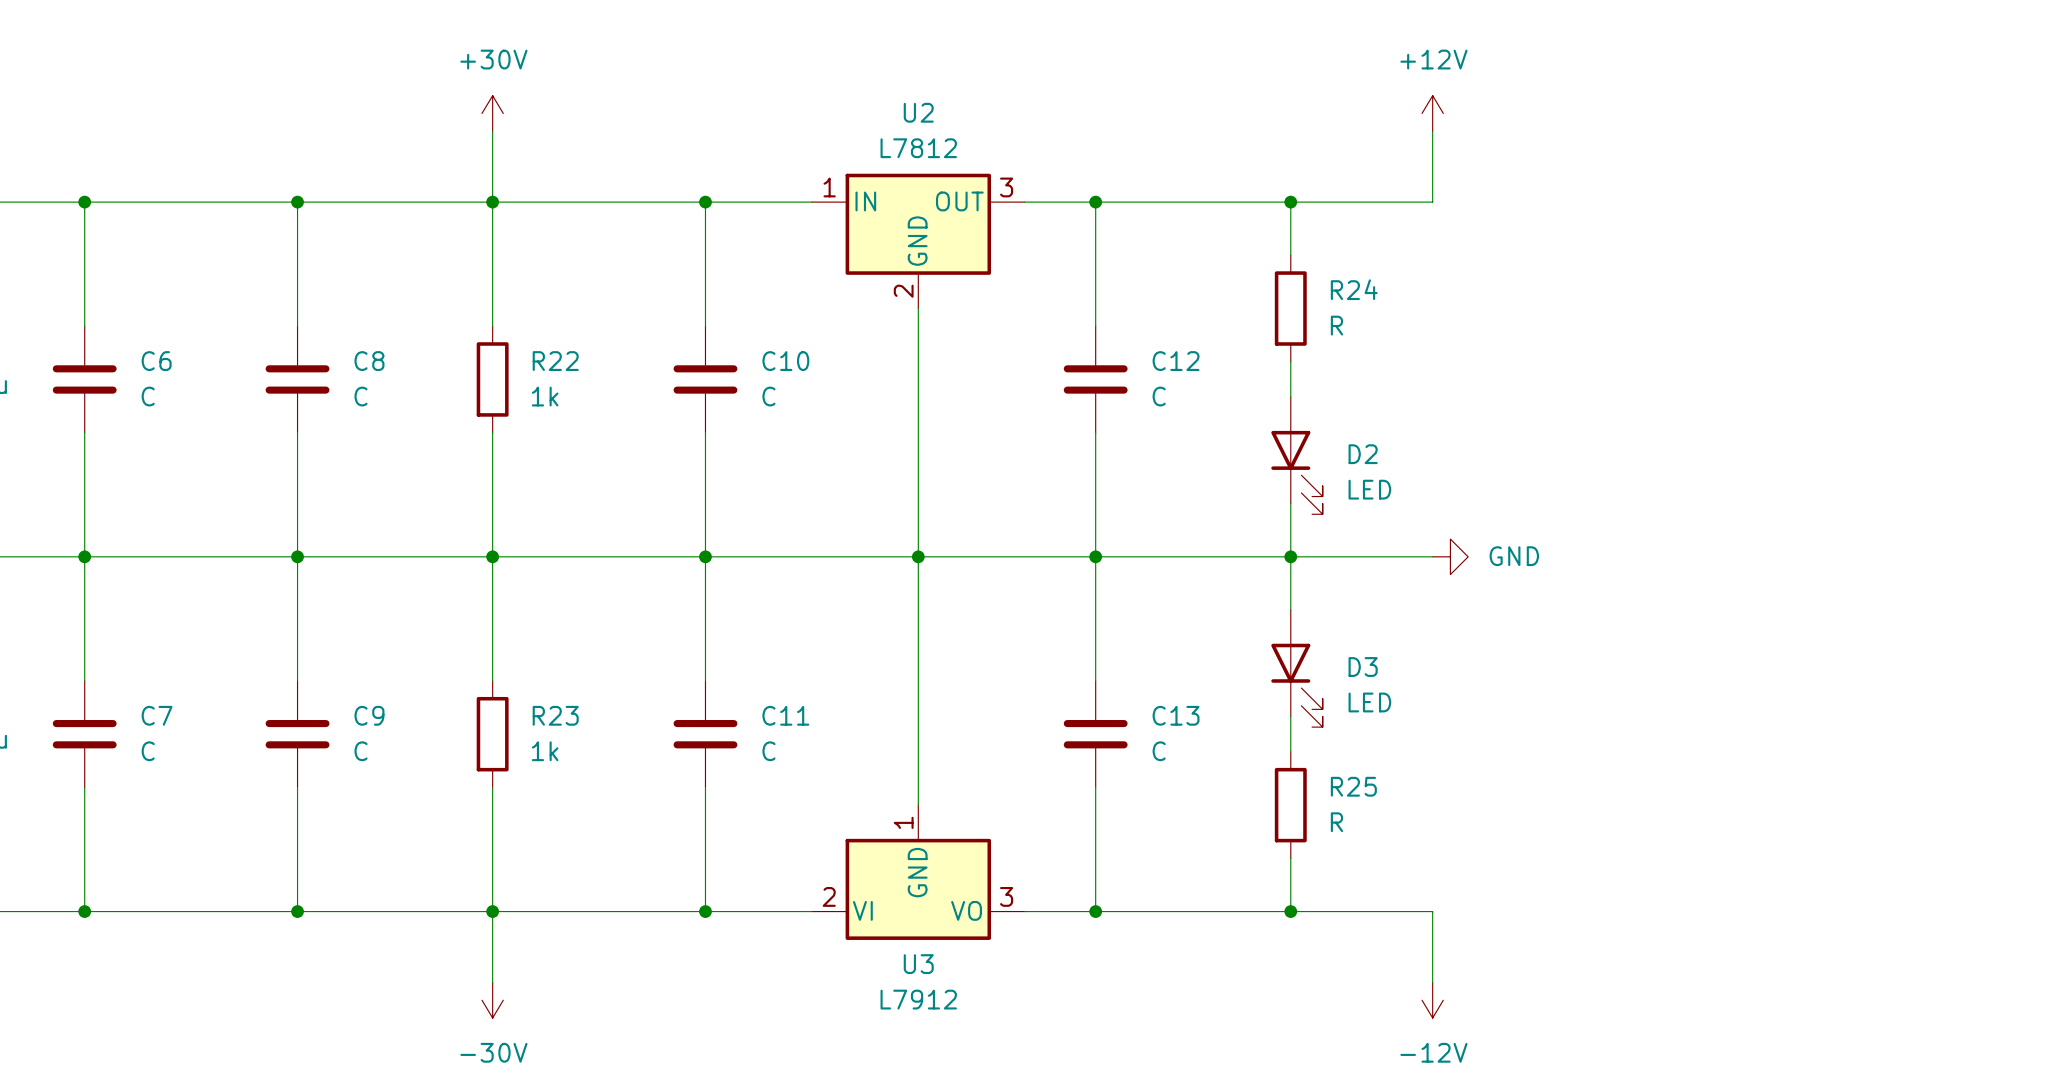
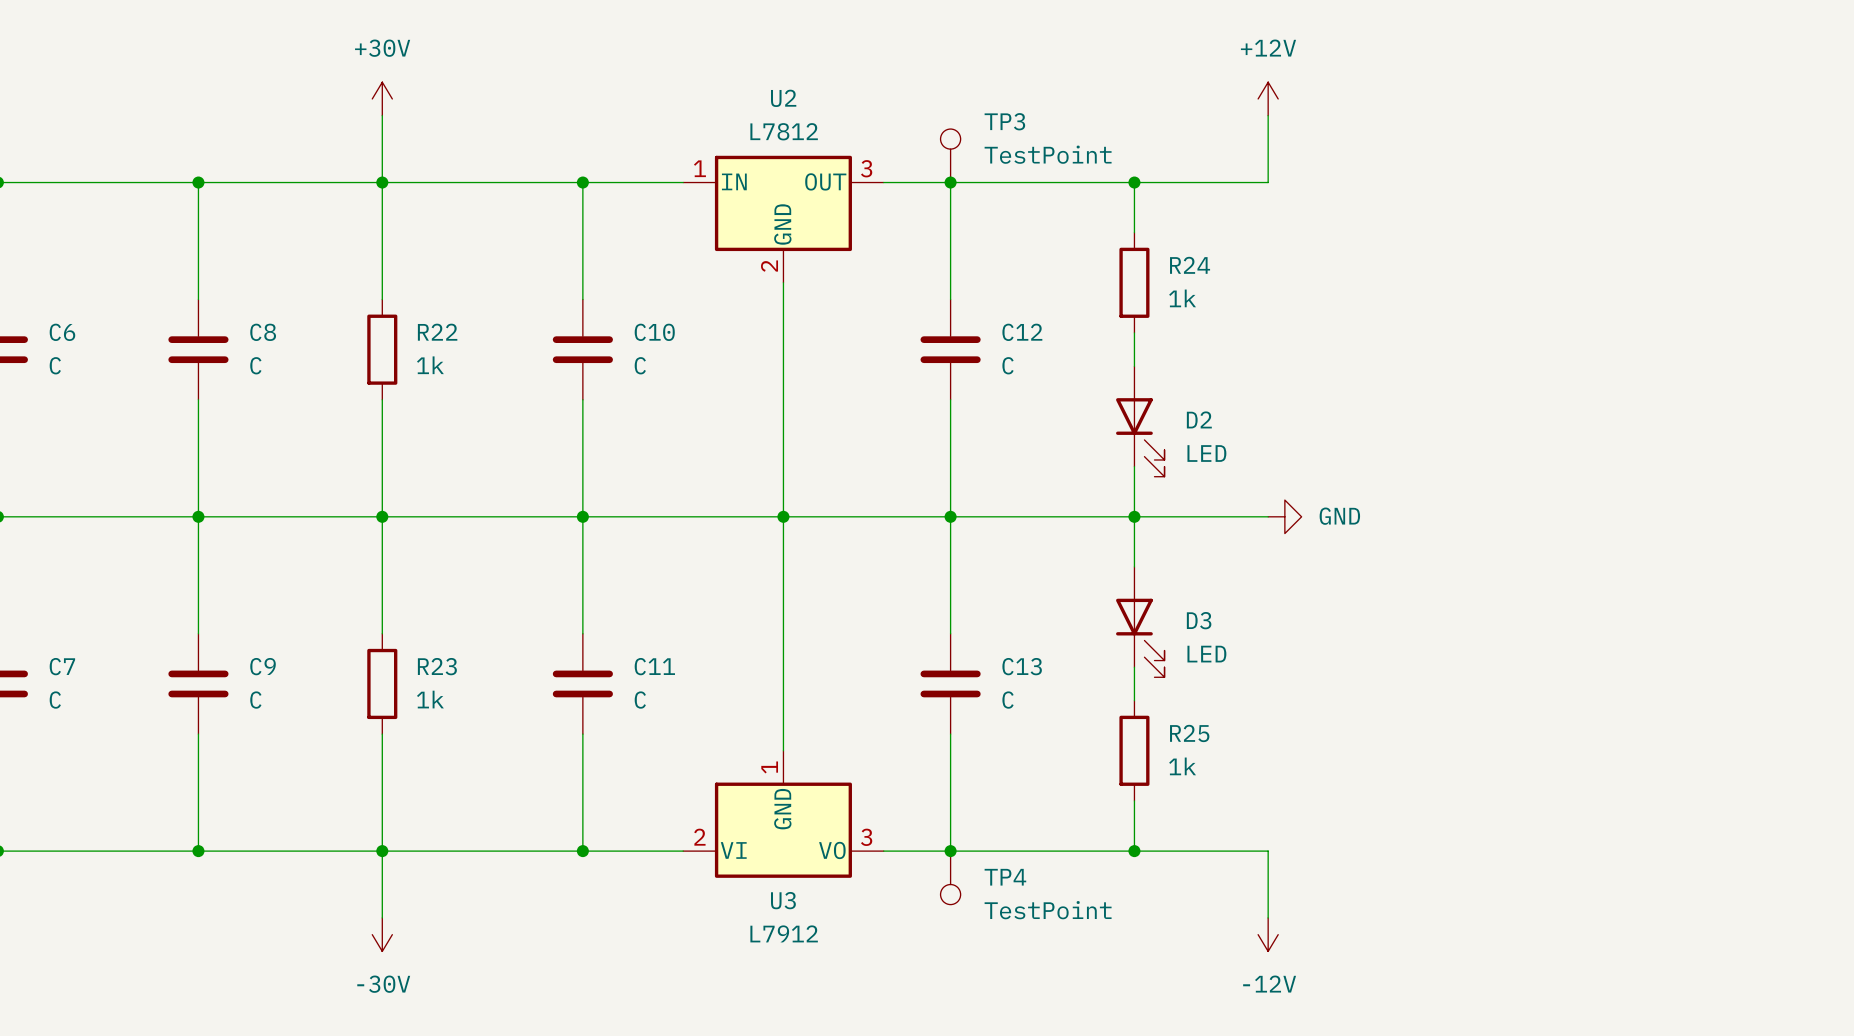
TP3: none -> TestPoint (950, 155)
R24 value: R (1336, 325) -> 1k (1182, 298)
R25 value: R (1336, 822) -> 1k (1182, 766)
TP4: none -> TestPoint (950, 877)

